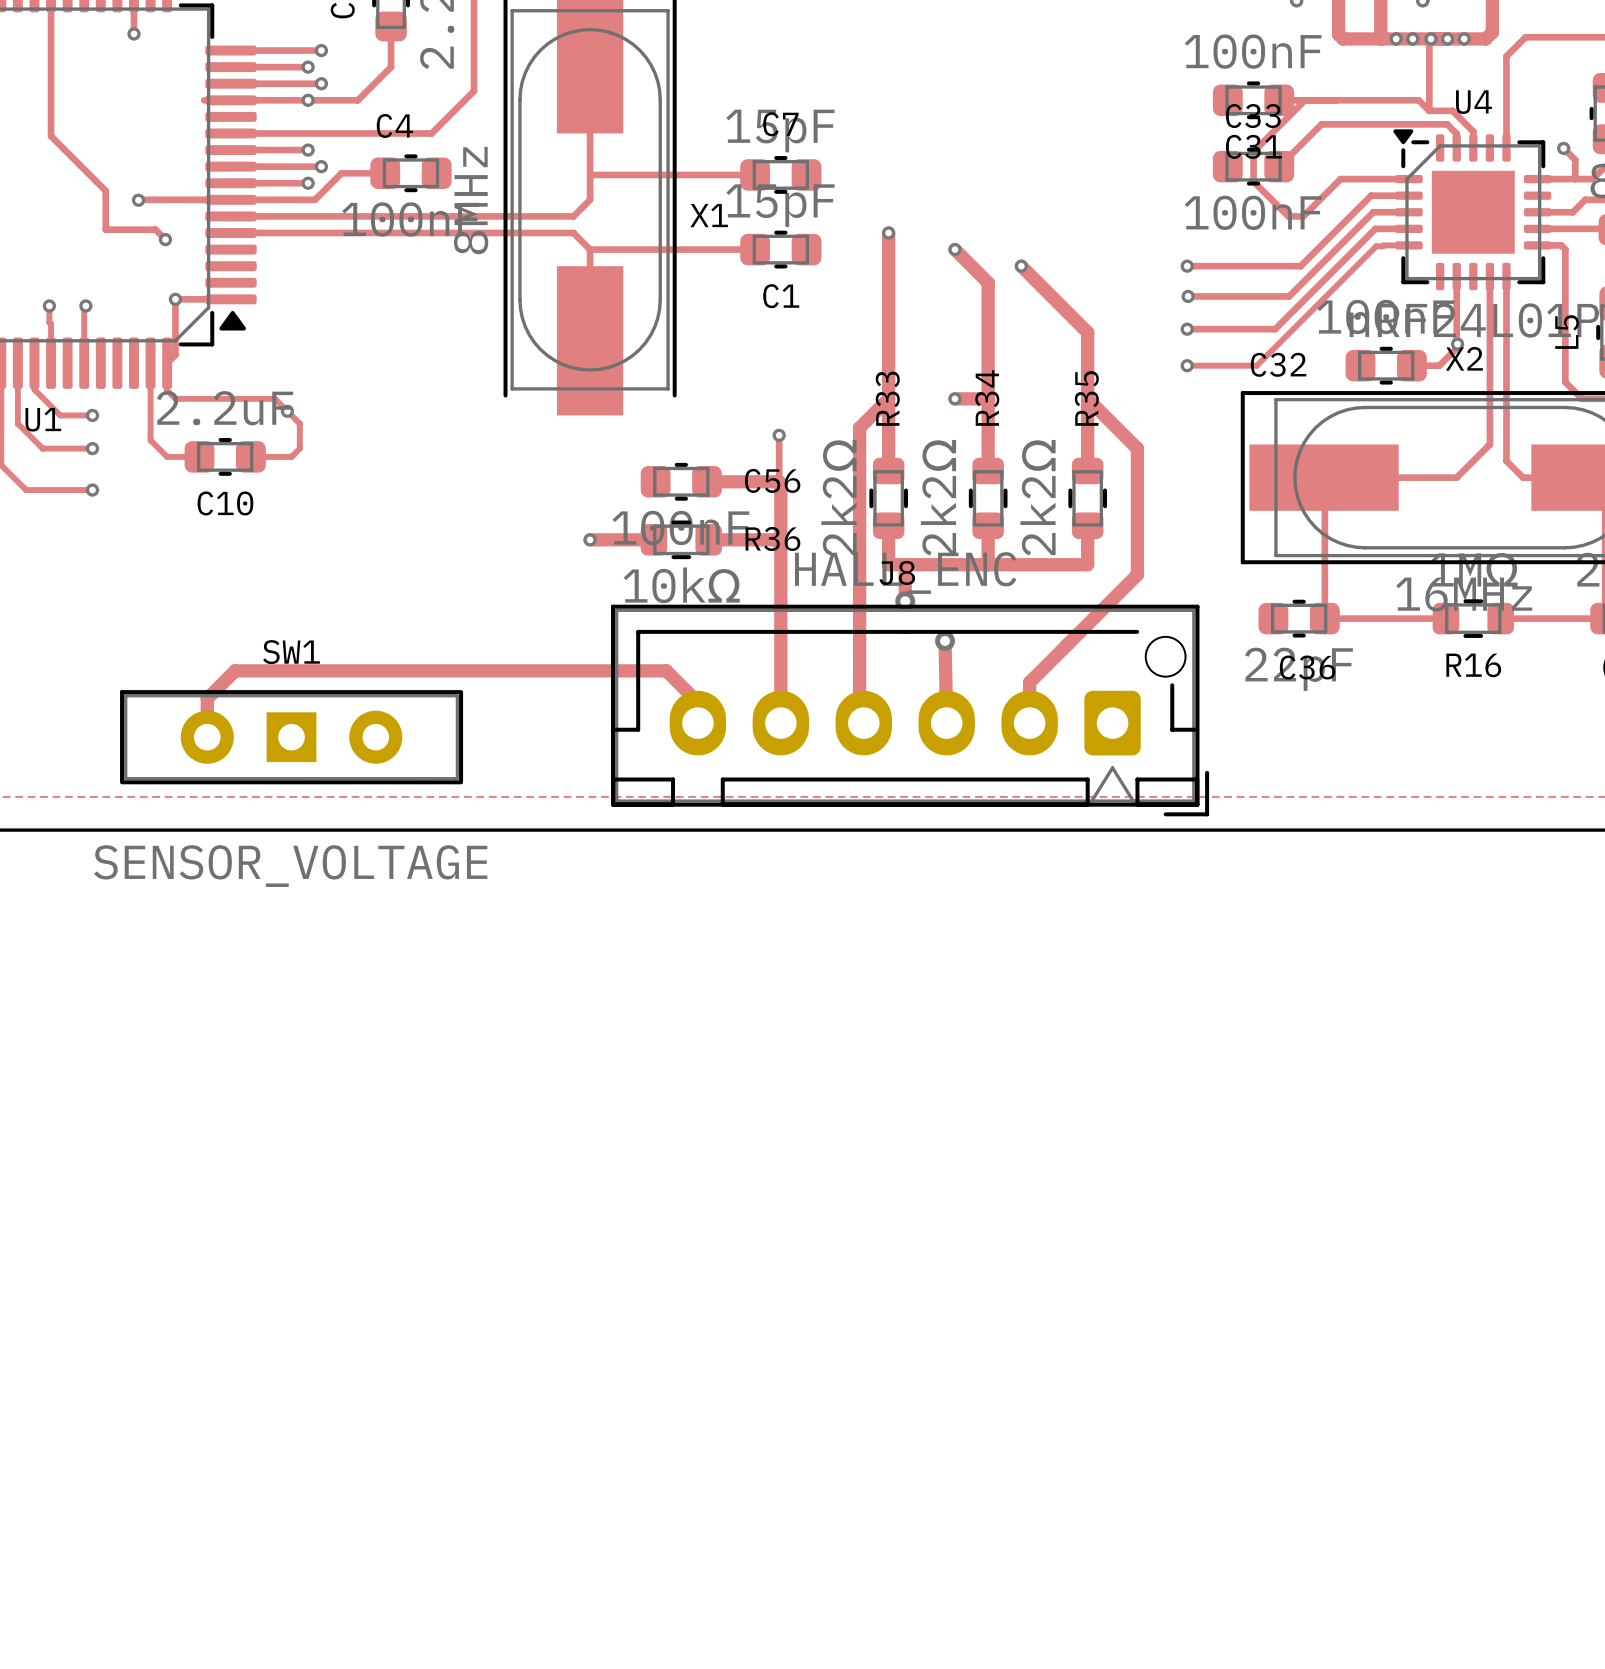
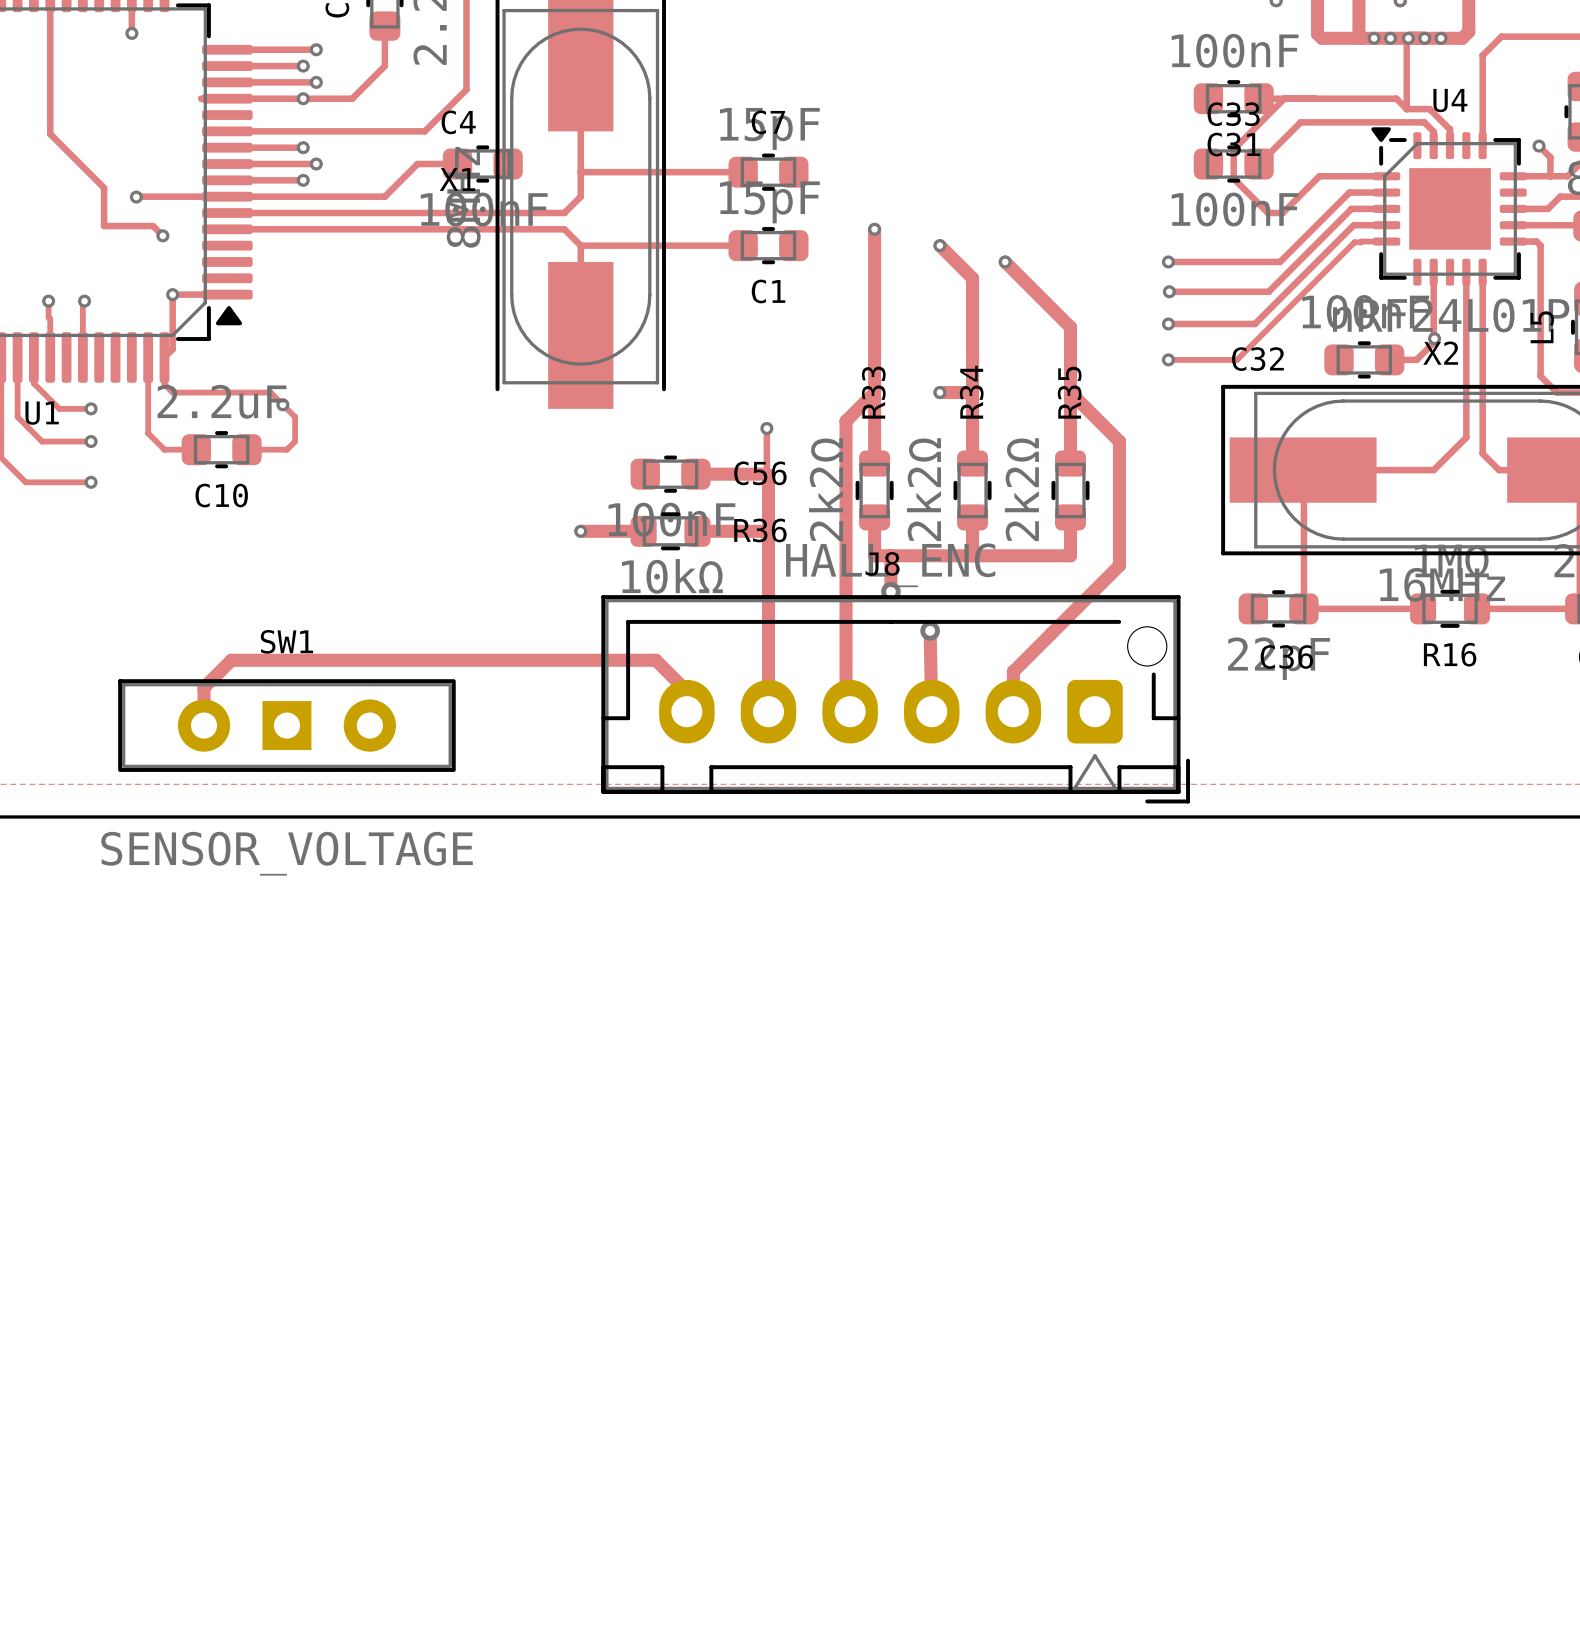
C4 name position: C4 (394, 125) -> C4 (458, 122)
track: (385, 173) (341, 173) (315, 199) -> (457, 164) (417, 164) (384, 196) (310, 196)
C4 position: (410, 173) -> (482, 164)
X1 name position: X1 (709, 215) -> X1 (457, 179)

